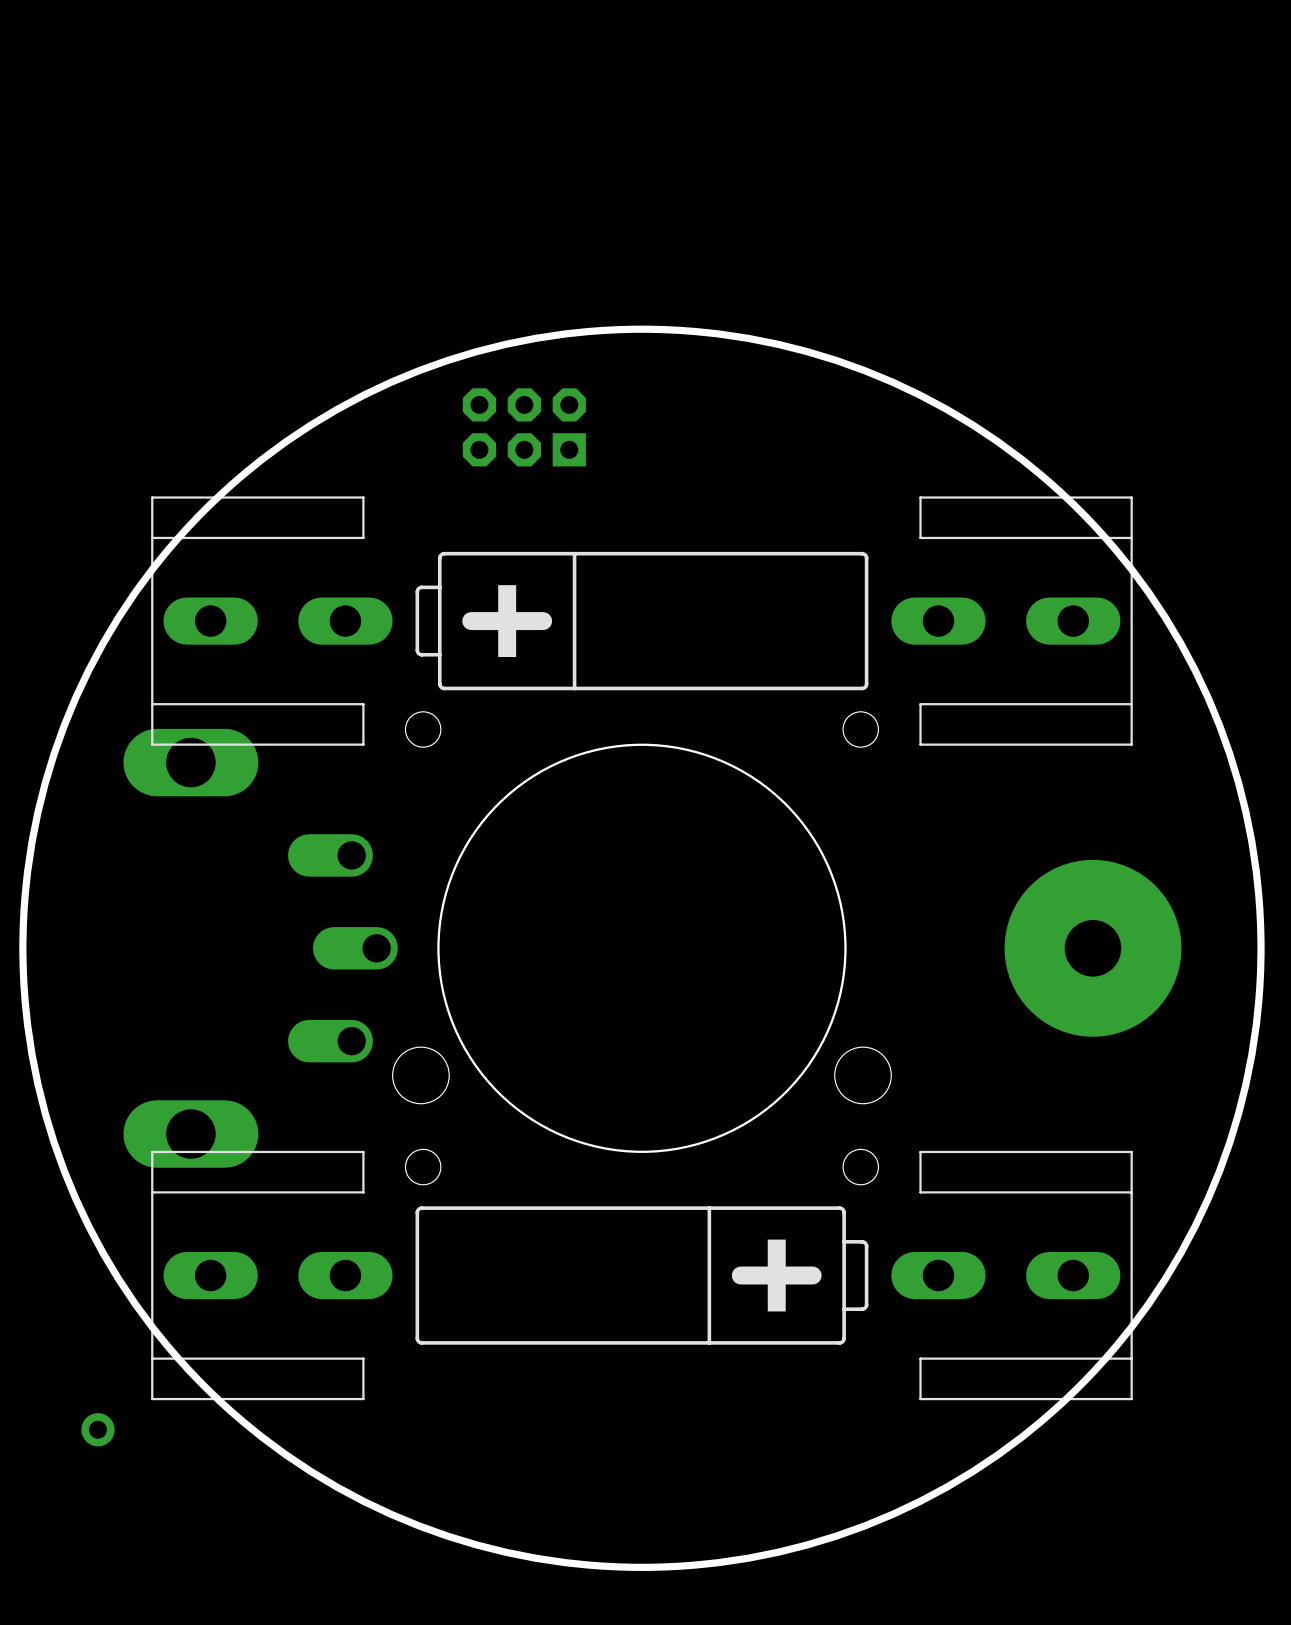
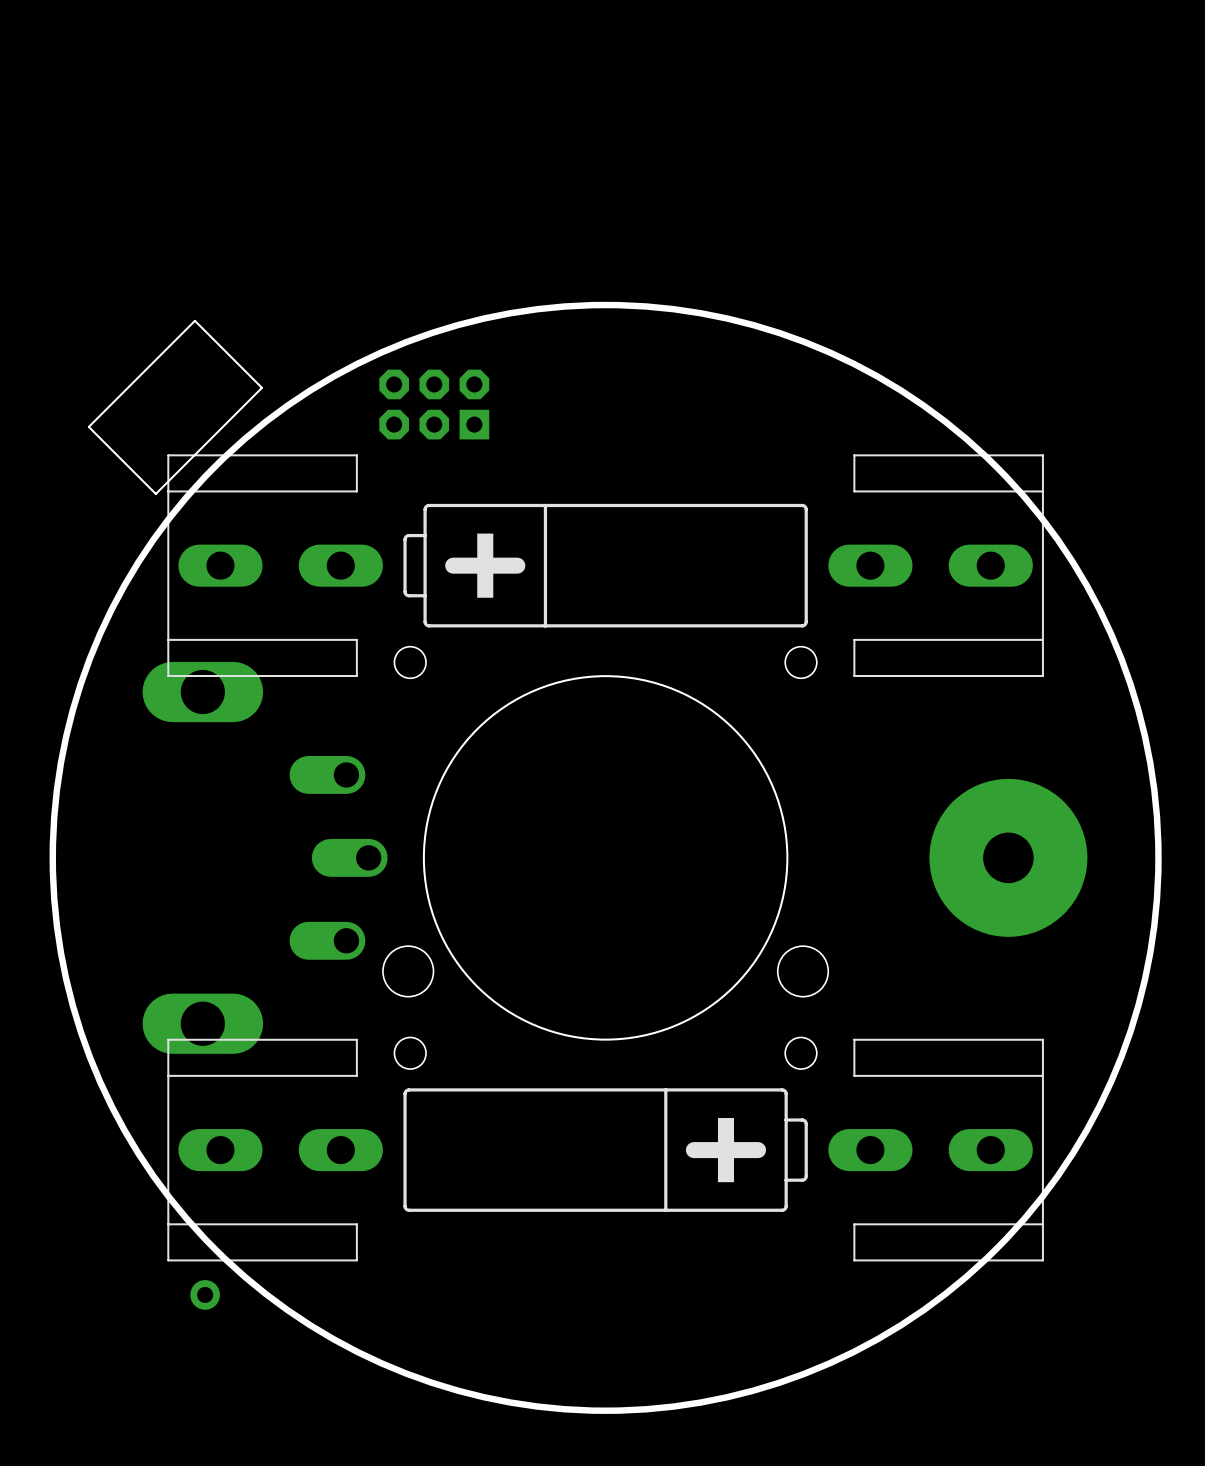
part position: (524, 427) -> (434, 404)
part: none -> (175, 407)
part position: (98, 1429) -> (205, 1294)

